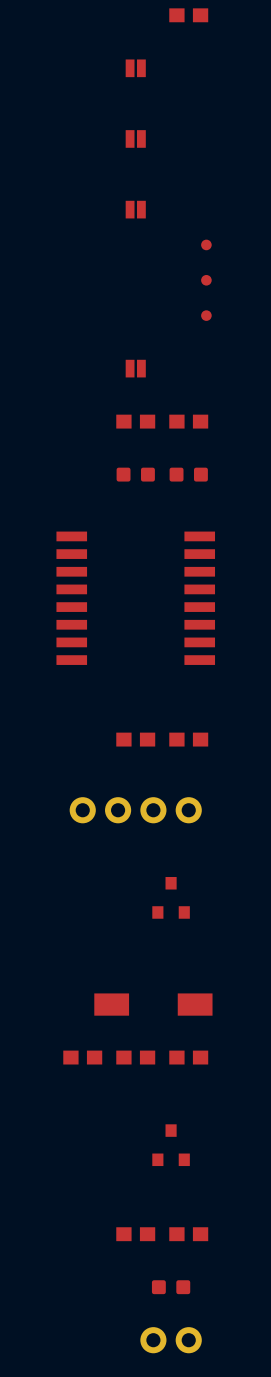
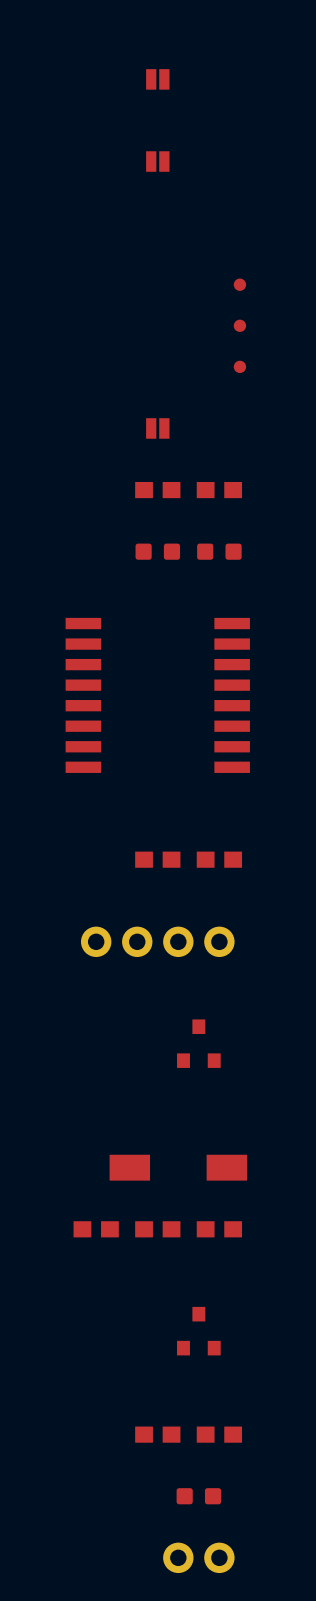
part: (188, 15) -> none
part: (135, 209) -> none

